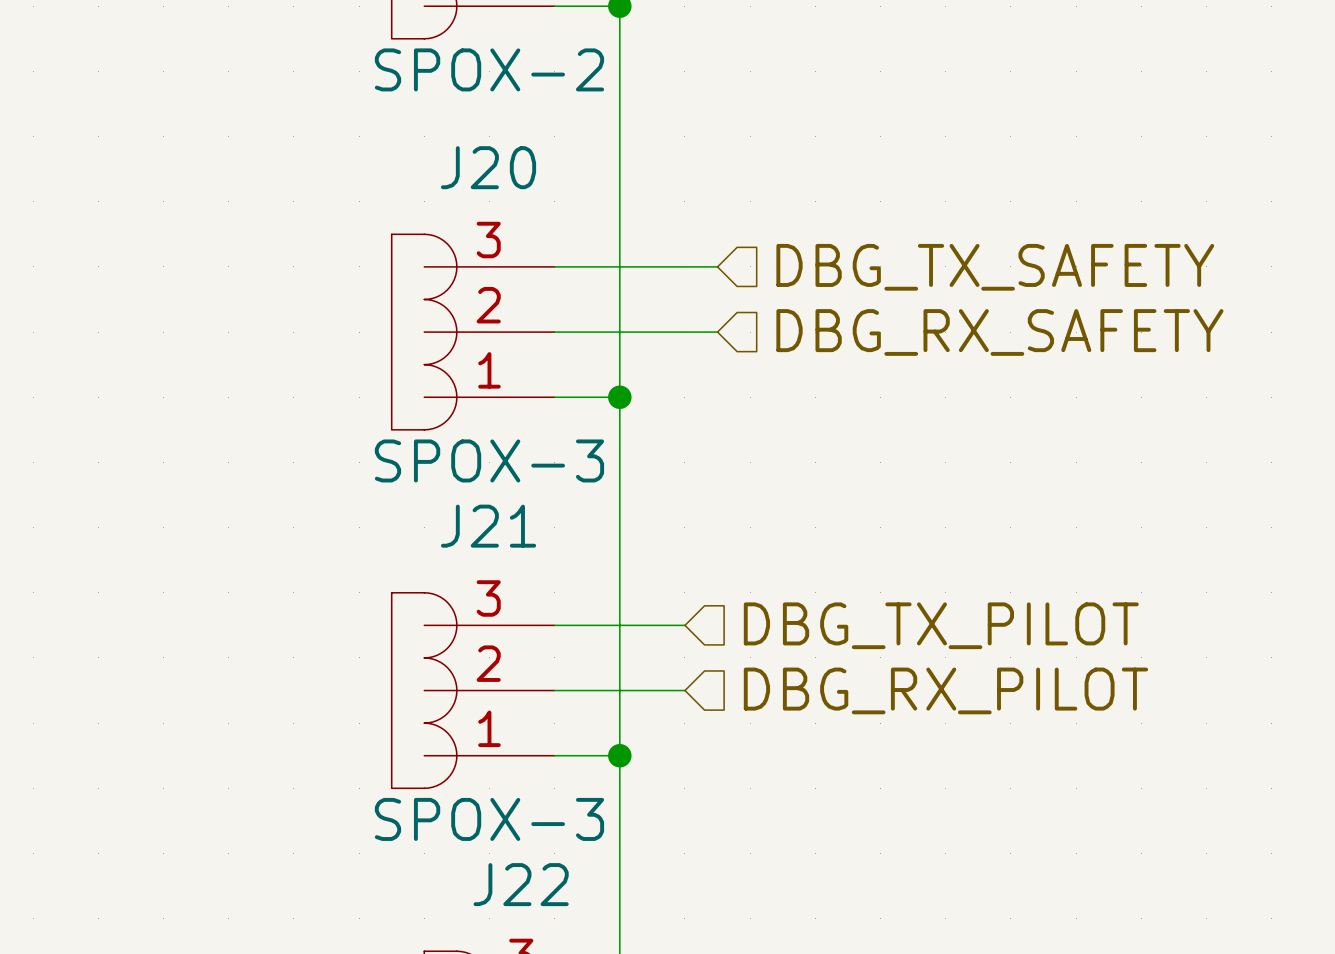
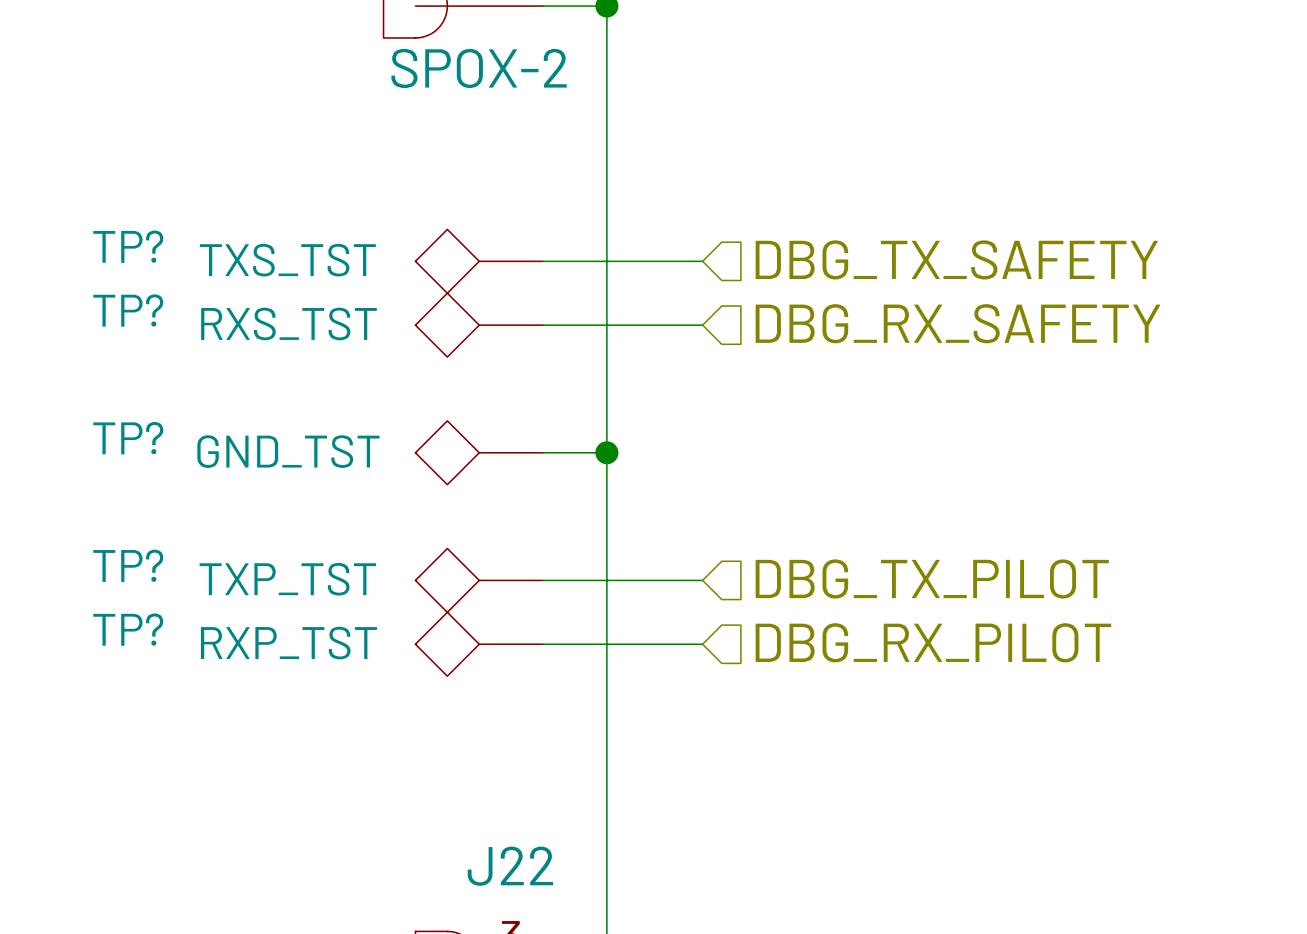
TP?: none -> TXS_TST (479, 261)
J20: SPOX-3 (473, 332) -> none
TP?: none -> RXS_TST (479, 325)
wire: (554, 397) (619, 397) -> (543, 452) (606, 452)
junction position: (619, 397) -> (606, 452)
TP?: none -> GND_TST (479, 452)
TP?: none -> TXP_TST (479, 580)
wire: none -> (543, 580) (702, 580)
wire: (554, 625) (684, 625) -> none
hierarchical label position: DBG_TX_PILOT (941, 625) -> DBG_TX_PILOT (932, 578)
TP?: none -> RXP_TST (479, 644)
wire: none -> (543, 644) (702, 644)
J21: SPOX-3 (473, 690) -> none
wire: (554, 690) (684, 690) -> none
hierarchical label position: DBG_RX_PILOT (945, 690) -> DBG_RX_PILOT (933, 642)
wire: (554, 755) (619, 755) -> none
junction: (619, 755) -> none

